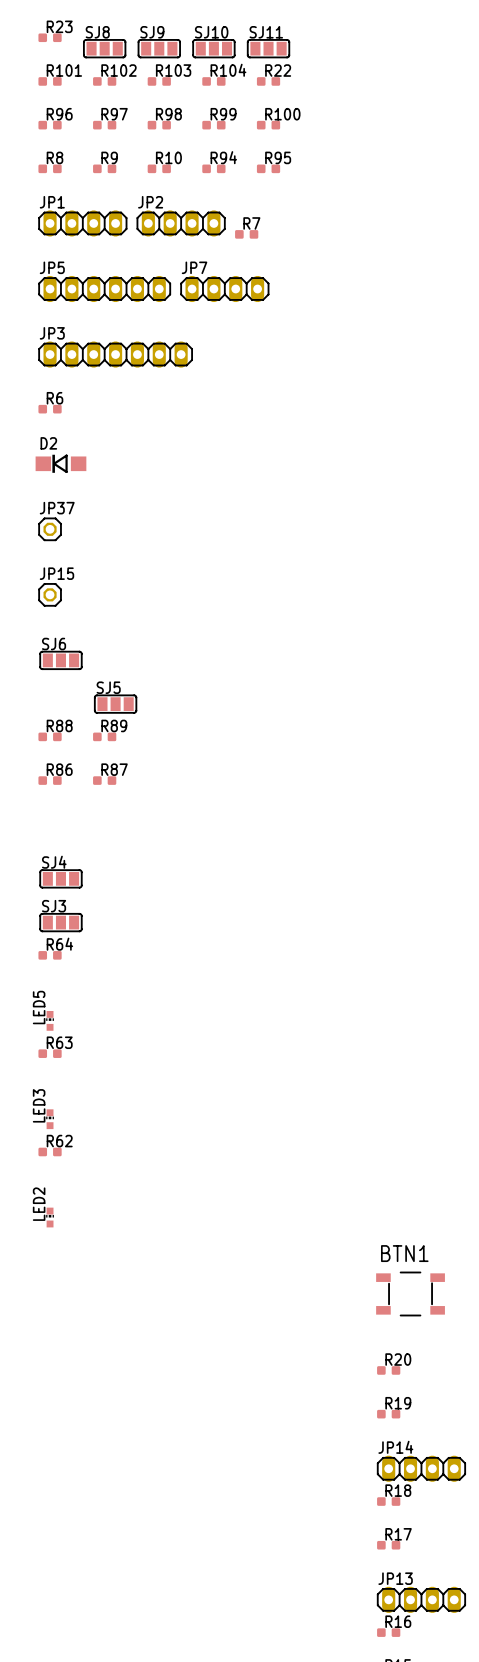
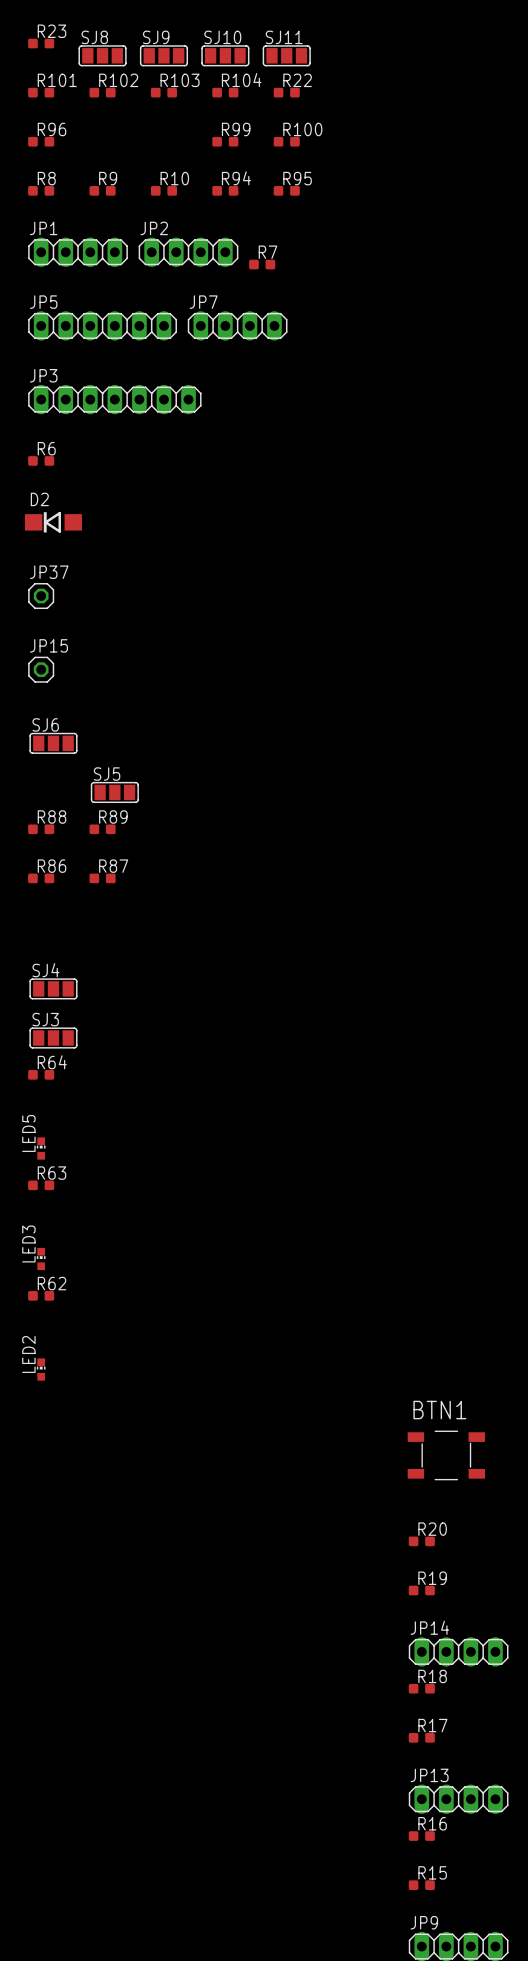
R97: (104, 125) -> none
R98: (159, 125) -> none

